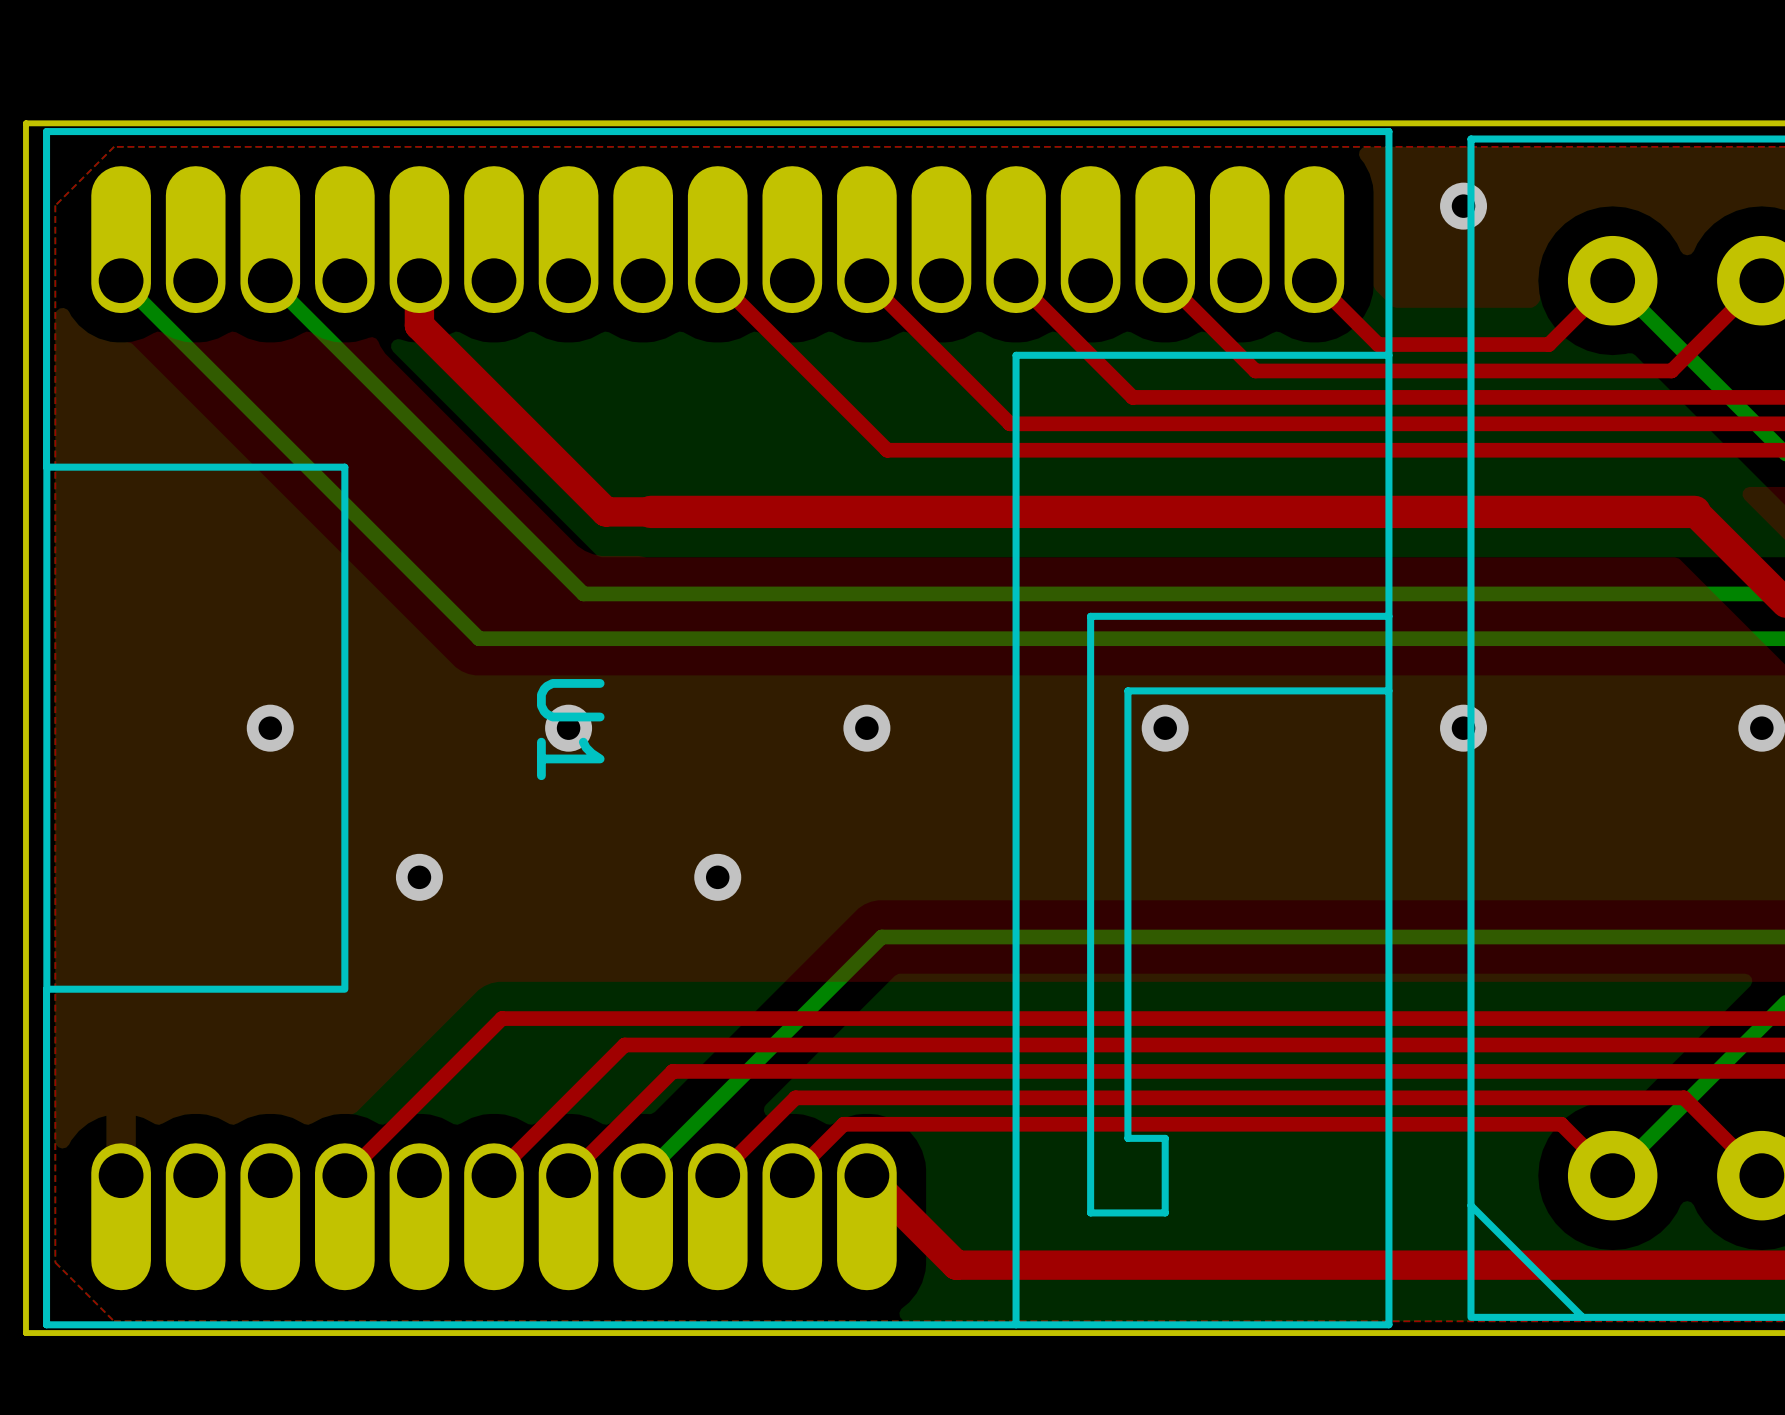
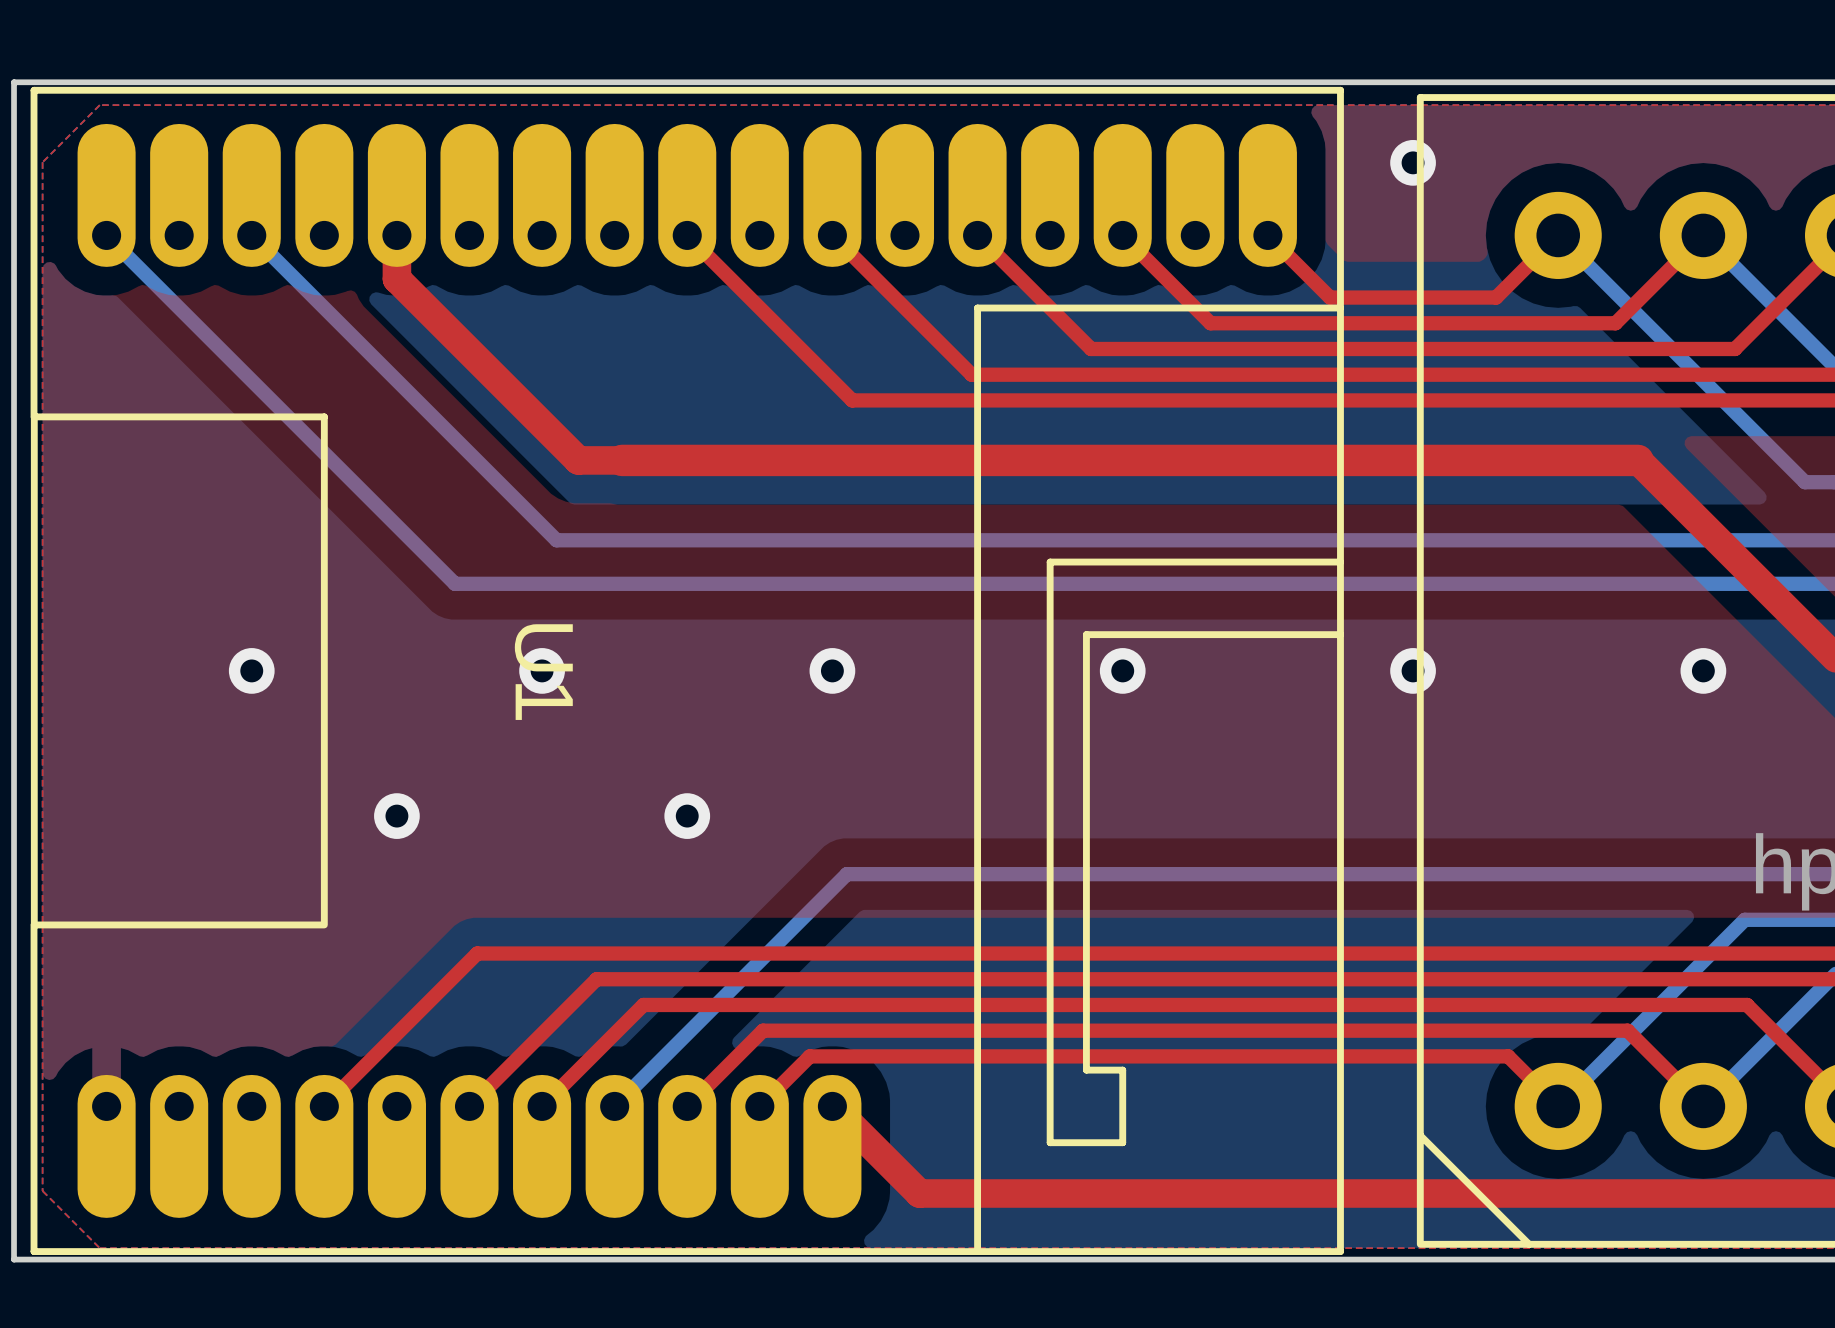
U1 footprint: [43, 128, 1393, 1329] -> [30, 86, 1344, 1256]

